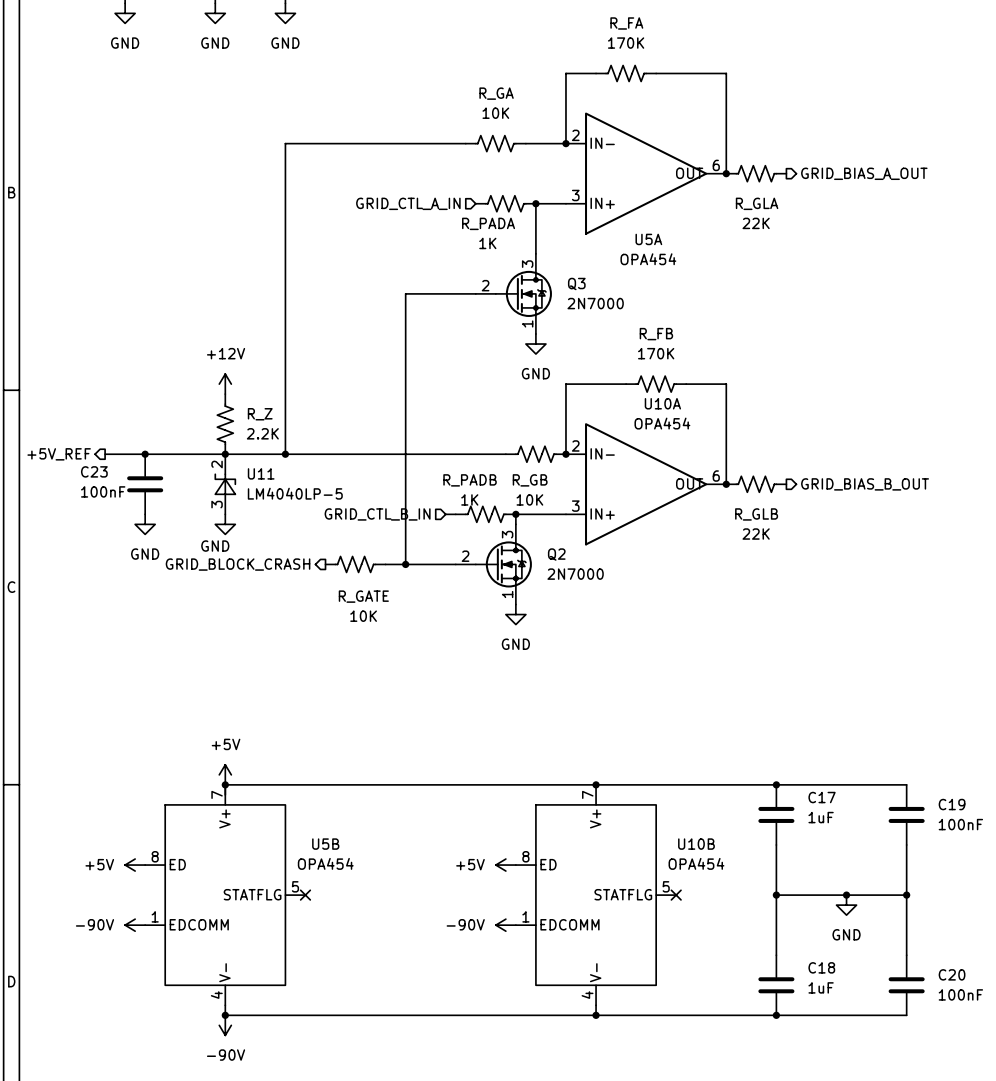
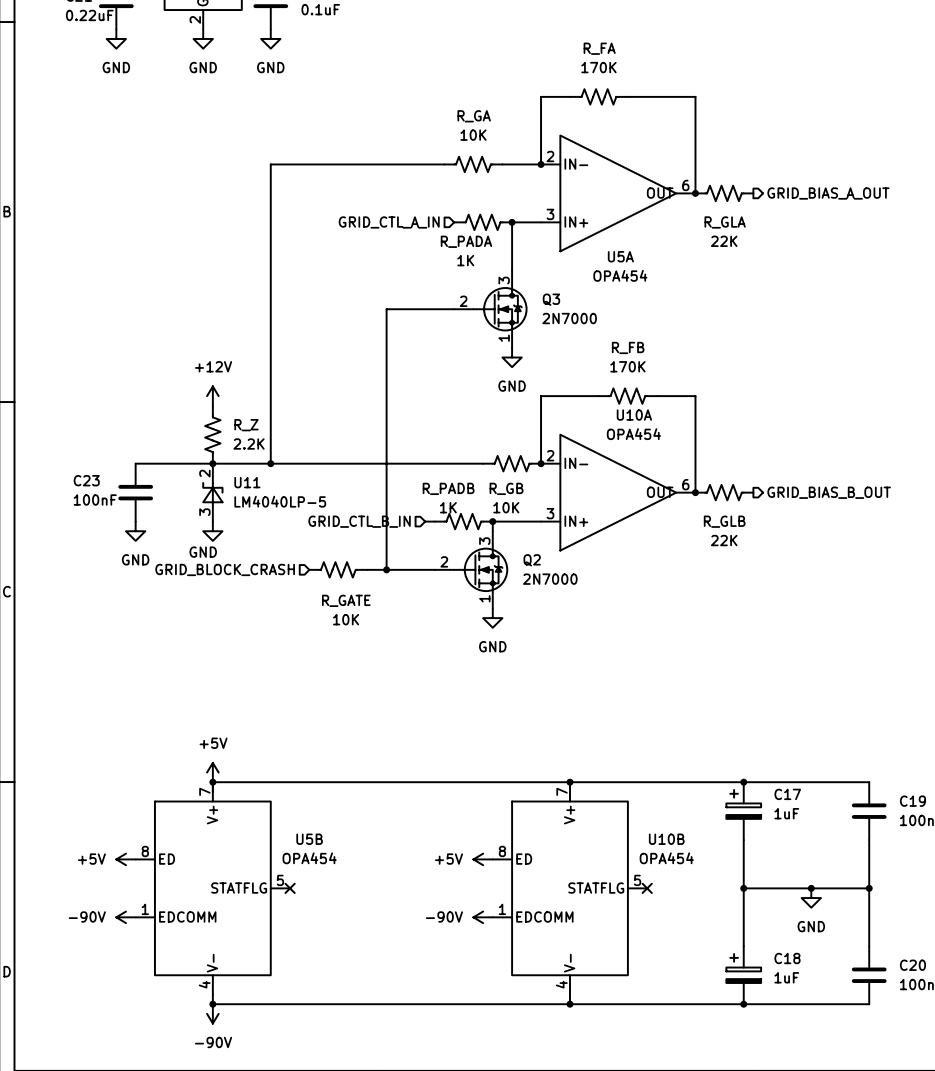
hierarchical label: +5V_REF (59, 454) -> none
wire: (105, 454) (145, 454) -> none
junction: (145, 454) -> none
hierarchical label shape: output (238, 564) -> input (225, 569)
C17 symbol: [758, 784, 795, 846] -> [726, 782, 762, 841]
C18 symbol: [758, 955, 795, 1016] -> [726, 946, 762, 1005]

